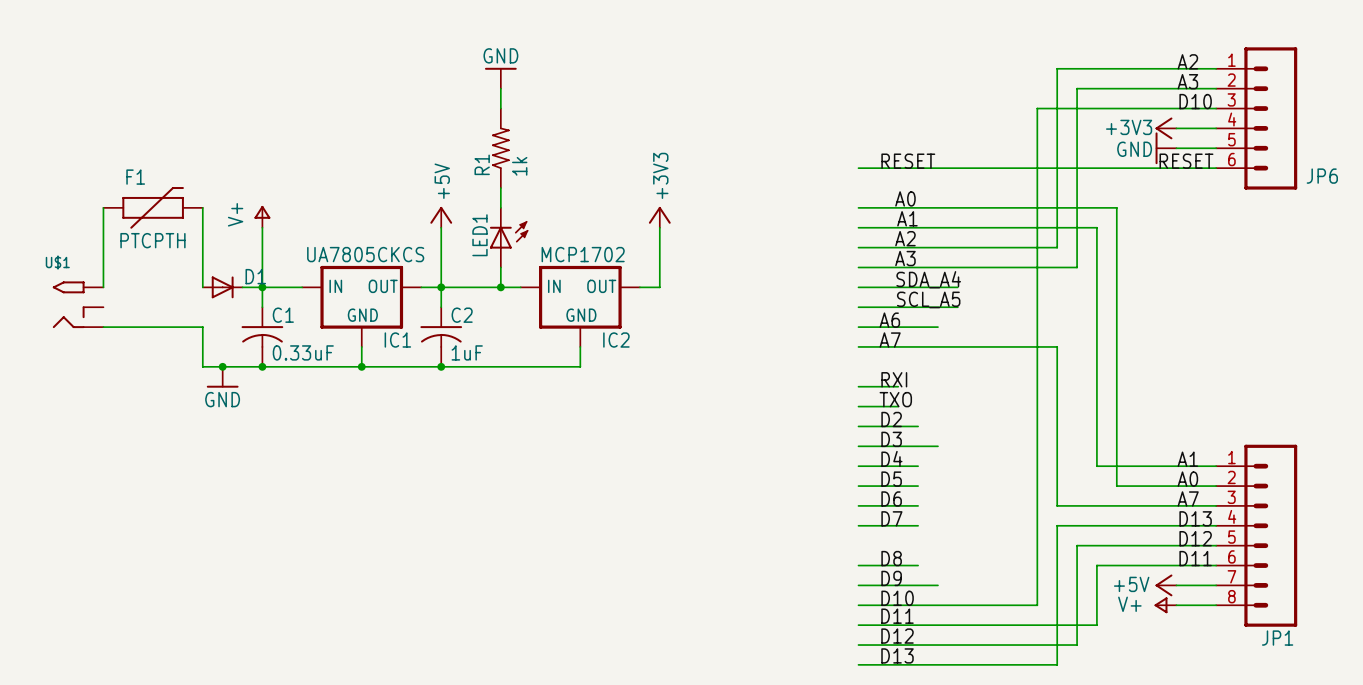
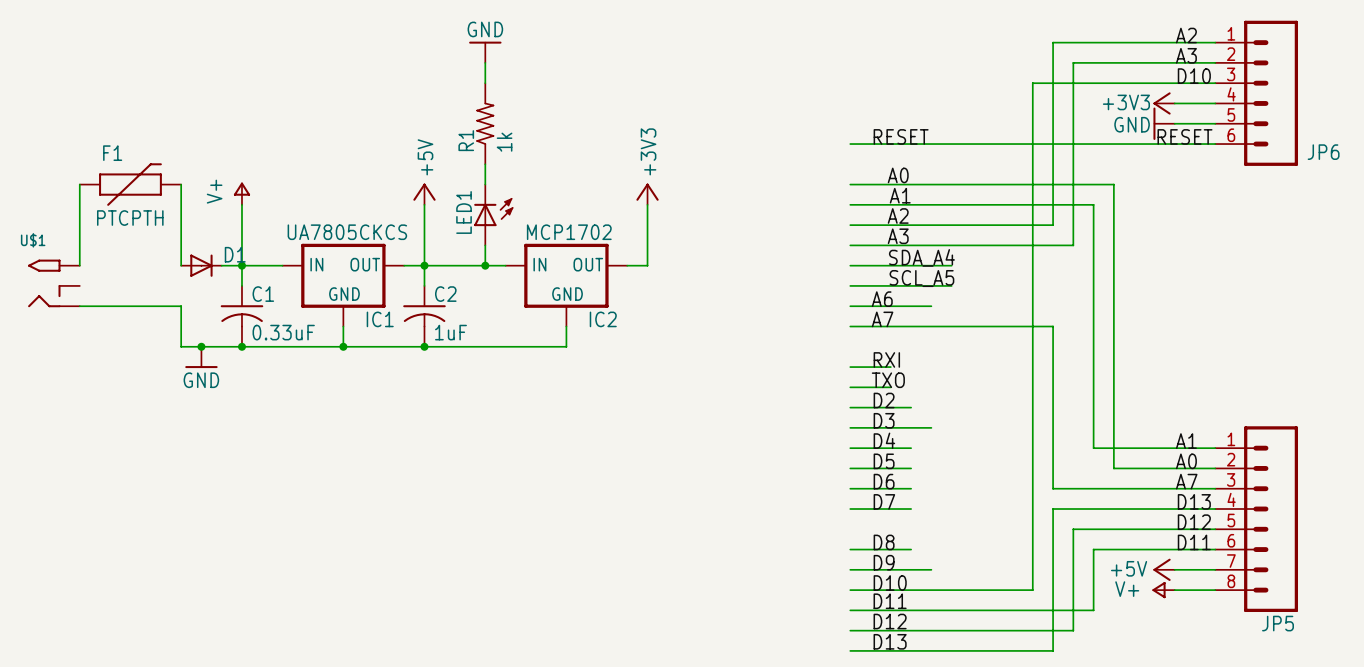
JP1 name: JP1 (1277, 638) -> JP5 (1277, 623)

